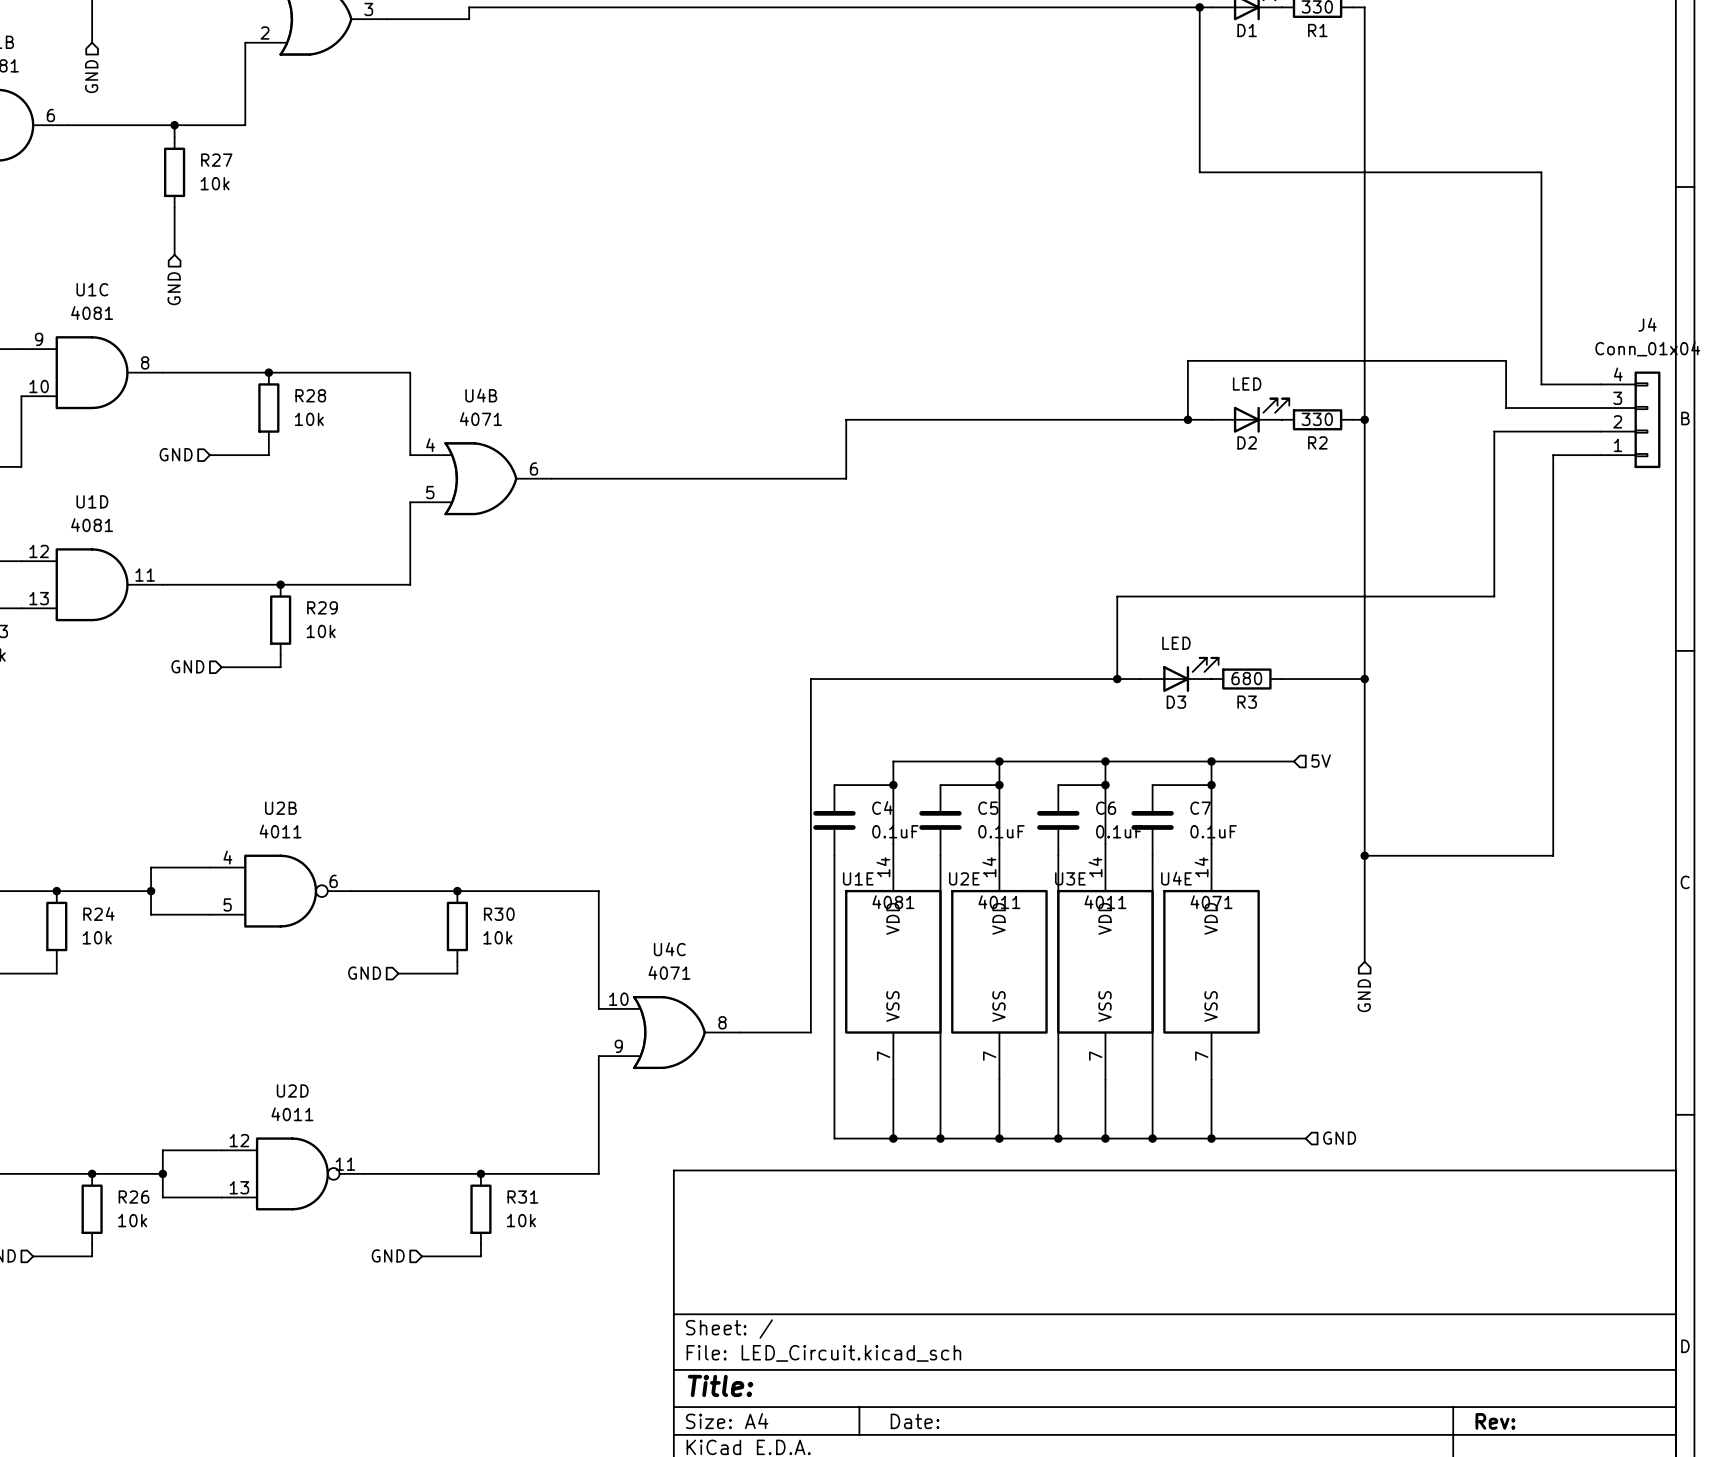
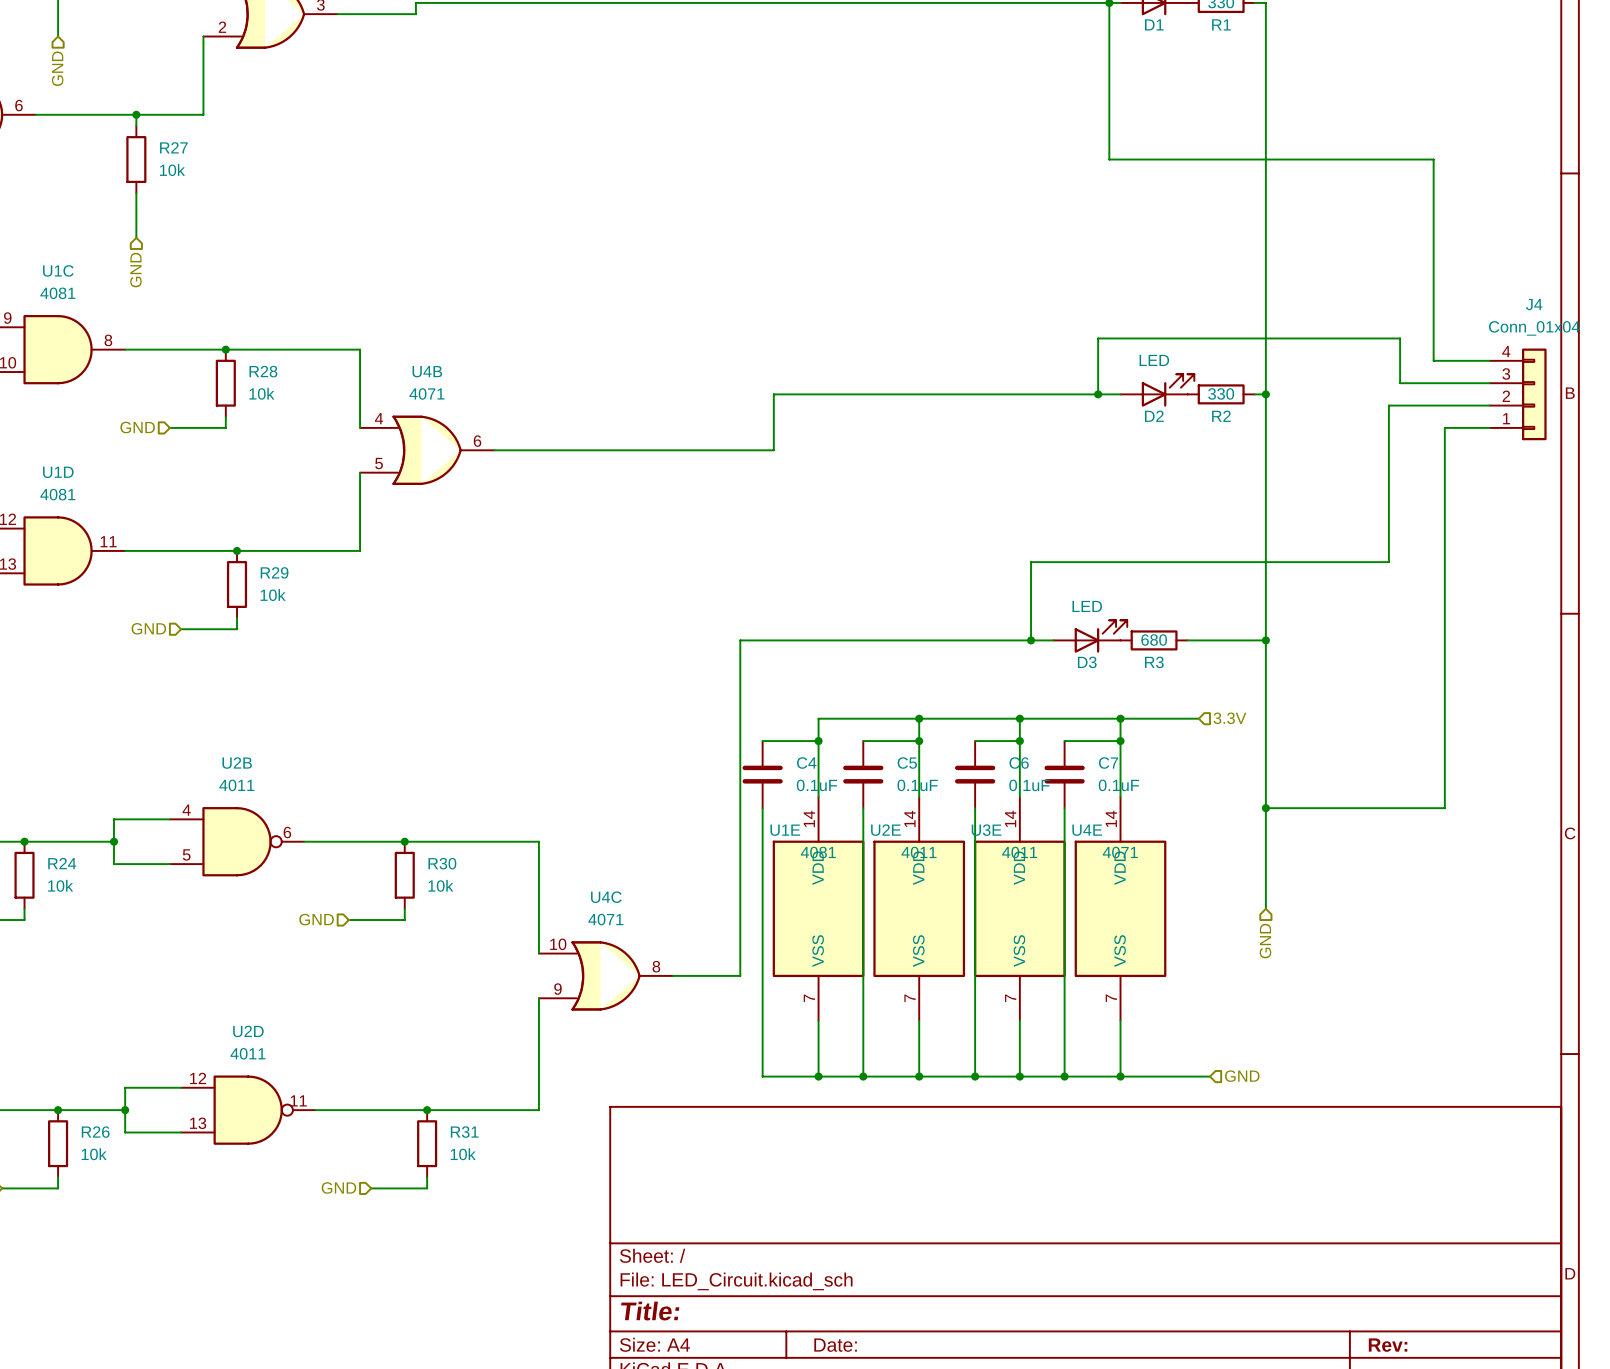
hierarchical label: 5V (1321, 761) -> 3.3V (1229, 718)

